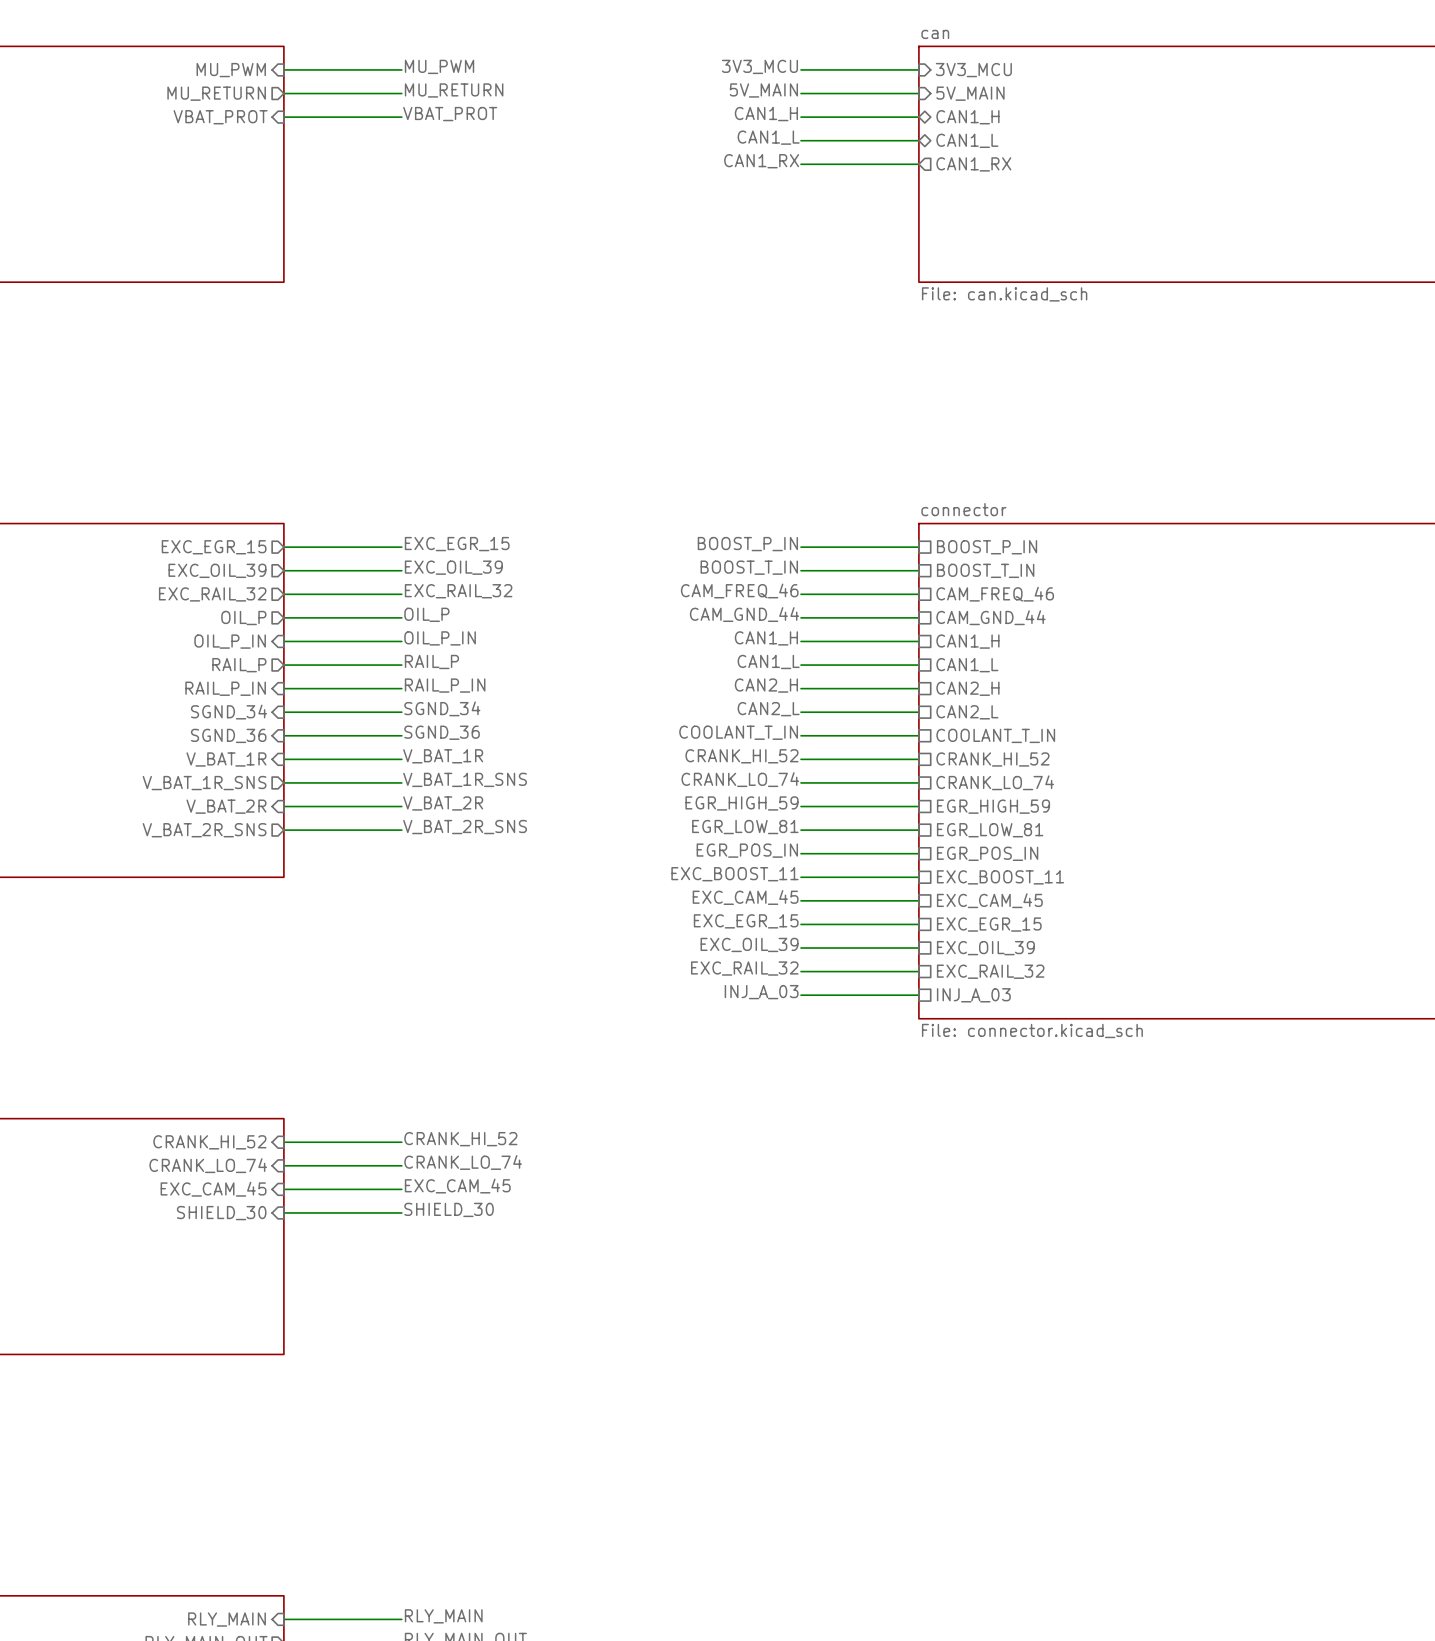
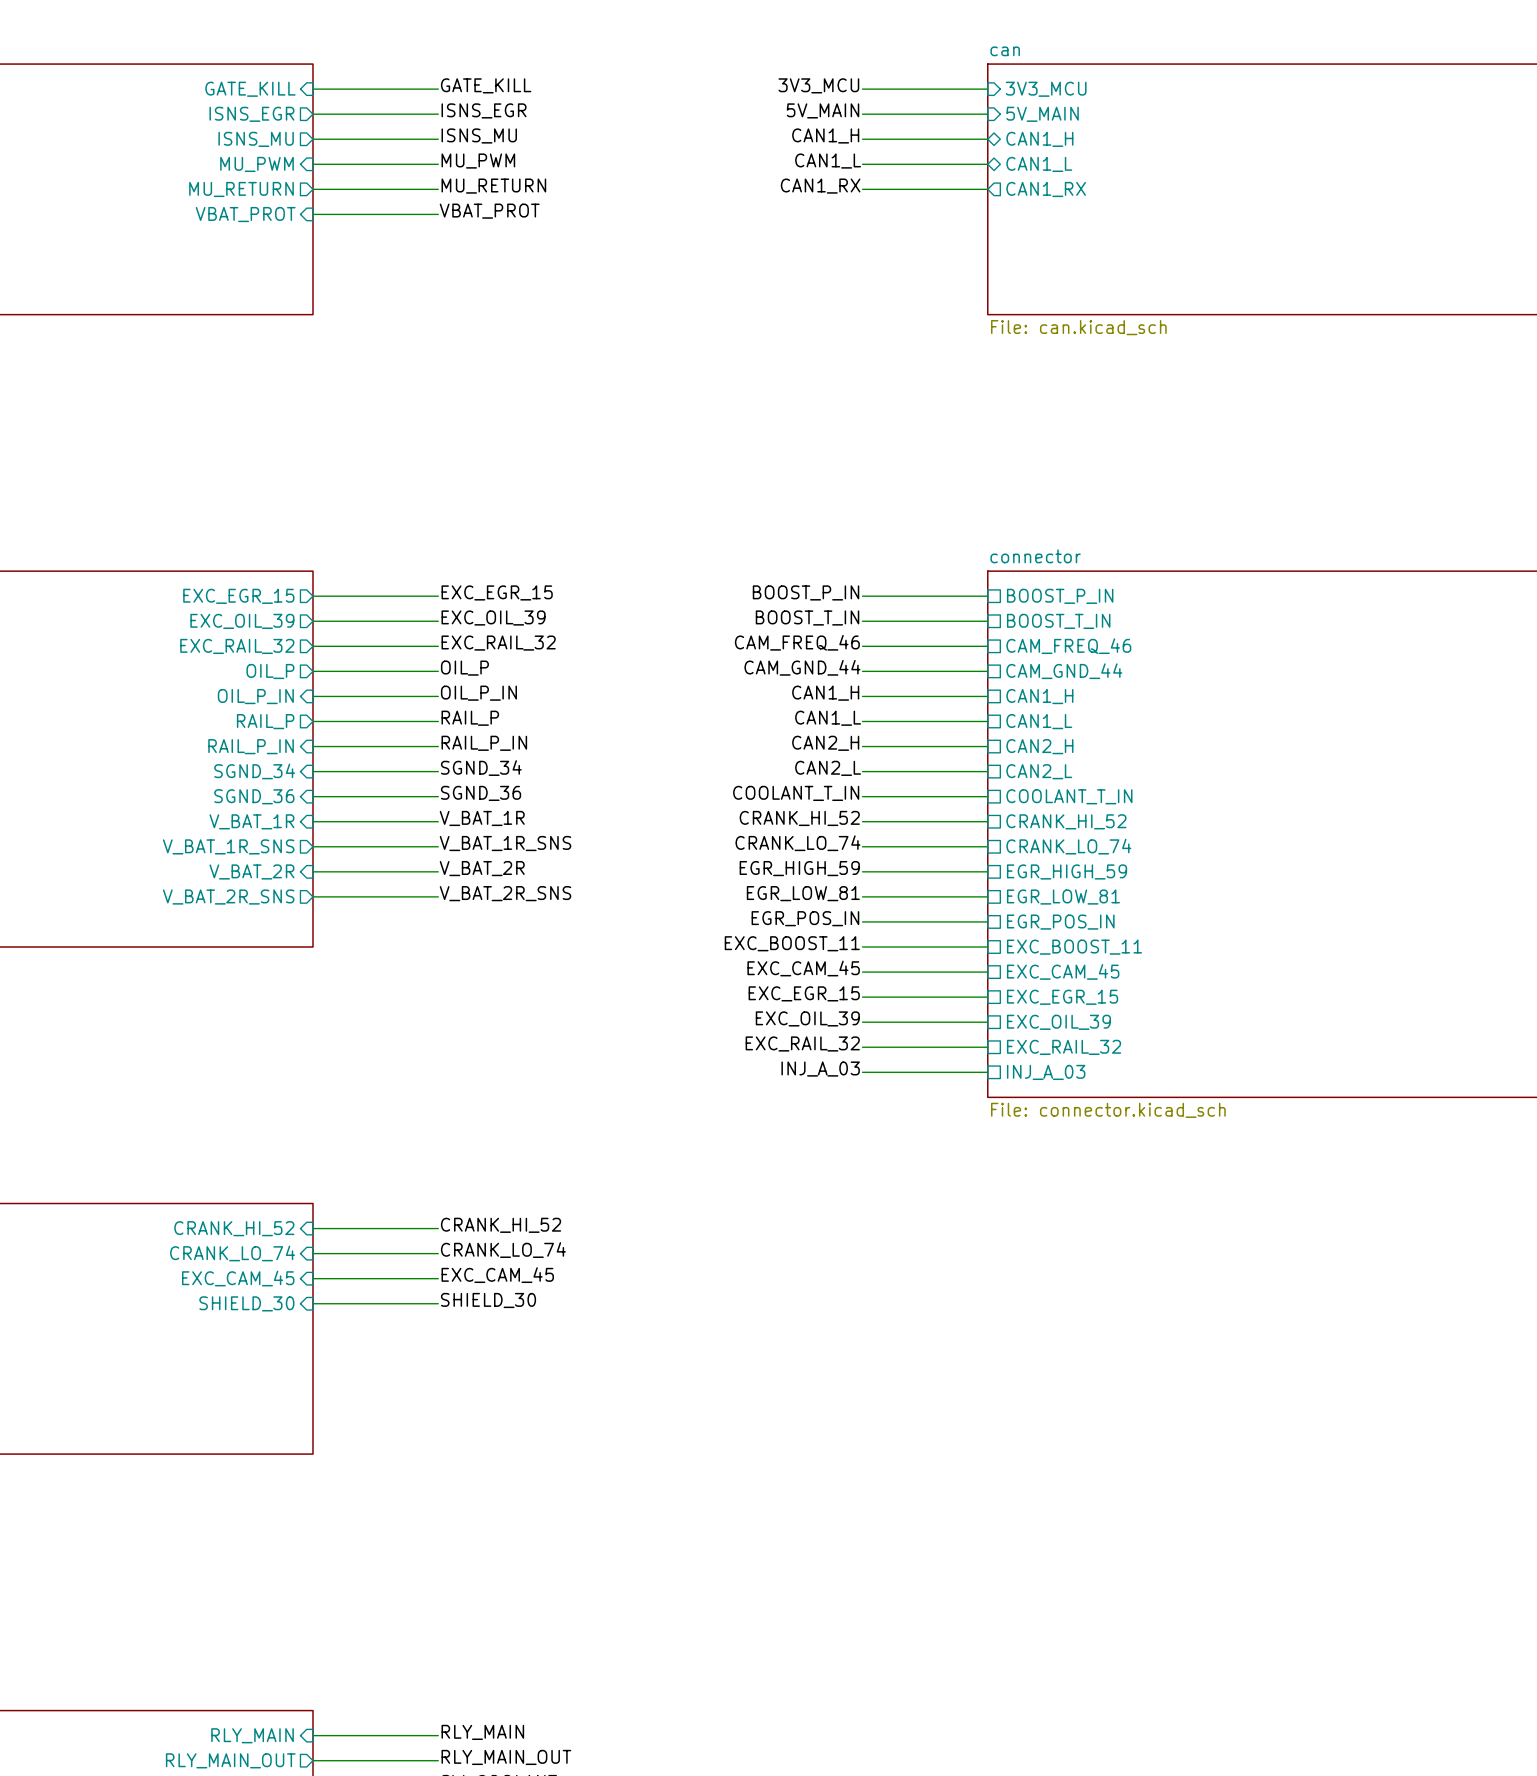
label: MU_PWM (439, 66) -> GATE_KILL (486, 85)
sheet pin: MU_PWM (231, 70) -> GATE_KILL (250, 89)
label: MU_RETURN (454, 90) -> ISNS_EGR (484, 110)
sheet pin: MU_RETURN (216, 93) -> ISNS_EGR (251, 114)
label: VBAT_PROT (450, 114) -> ISNS_MU (479, 135)
sheet pin shape: input (220, 117) -> output (256, 139)
sheet pin: VBAT_PROT (220, 117) -> ISNS_MU (256, 139)
label: none -> MU_PWM (478, 161)
sheet pin: none -> MU_PWM (257, 164)
wire: none -> (312, 164) (438, 164)
label: none -> MU_RETURN (493, 186)
sheet pin: none -> MU_RETURN (241, 189)
wire: none -> (312, 189) (438, 189)
label: none -> VBAT_PROT (489, 211)
sheet pin: none -> VBAT_PROT (245, 214)
wire: none -> (312, 214) (438, 214)

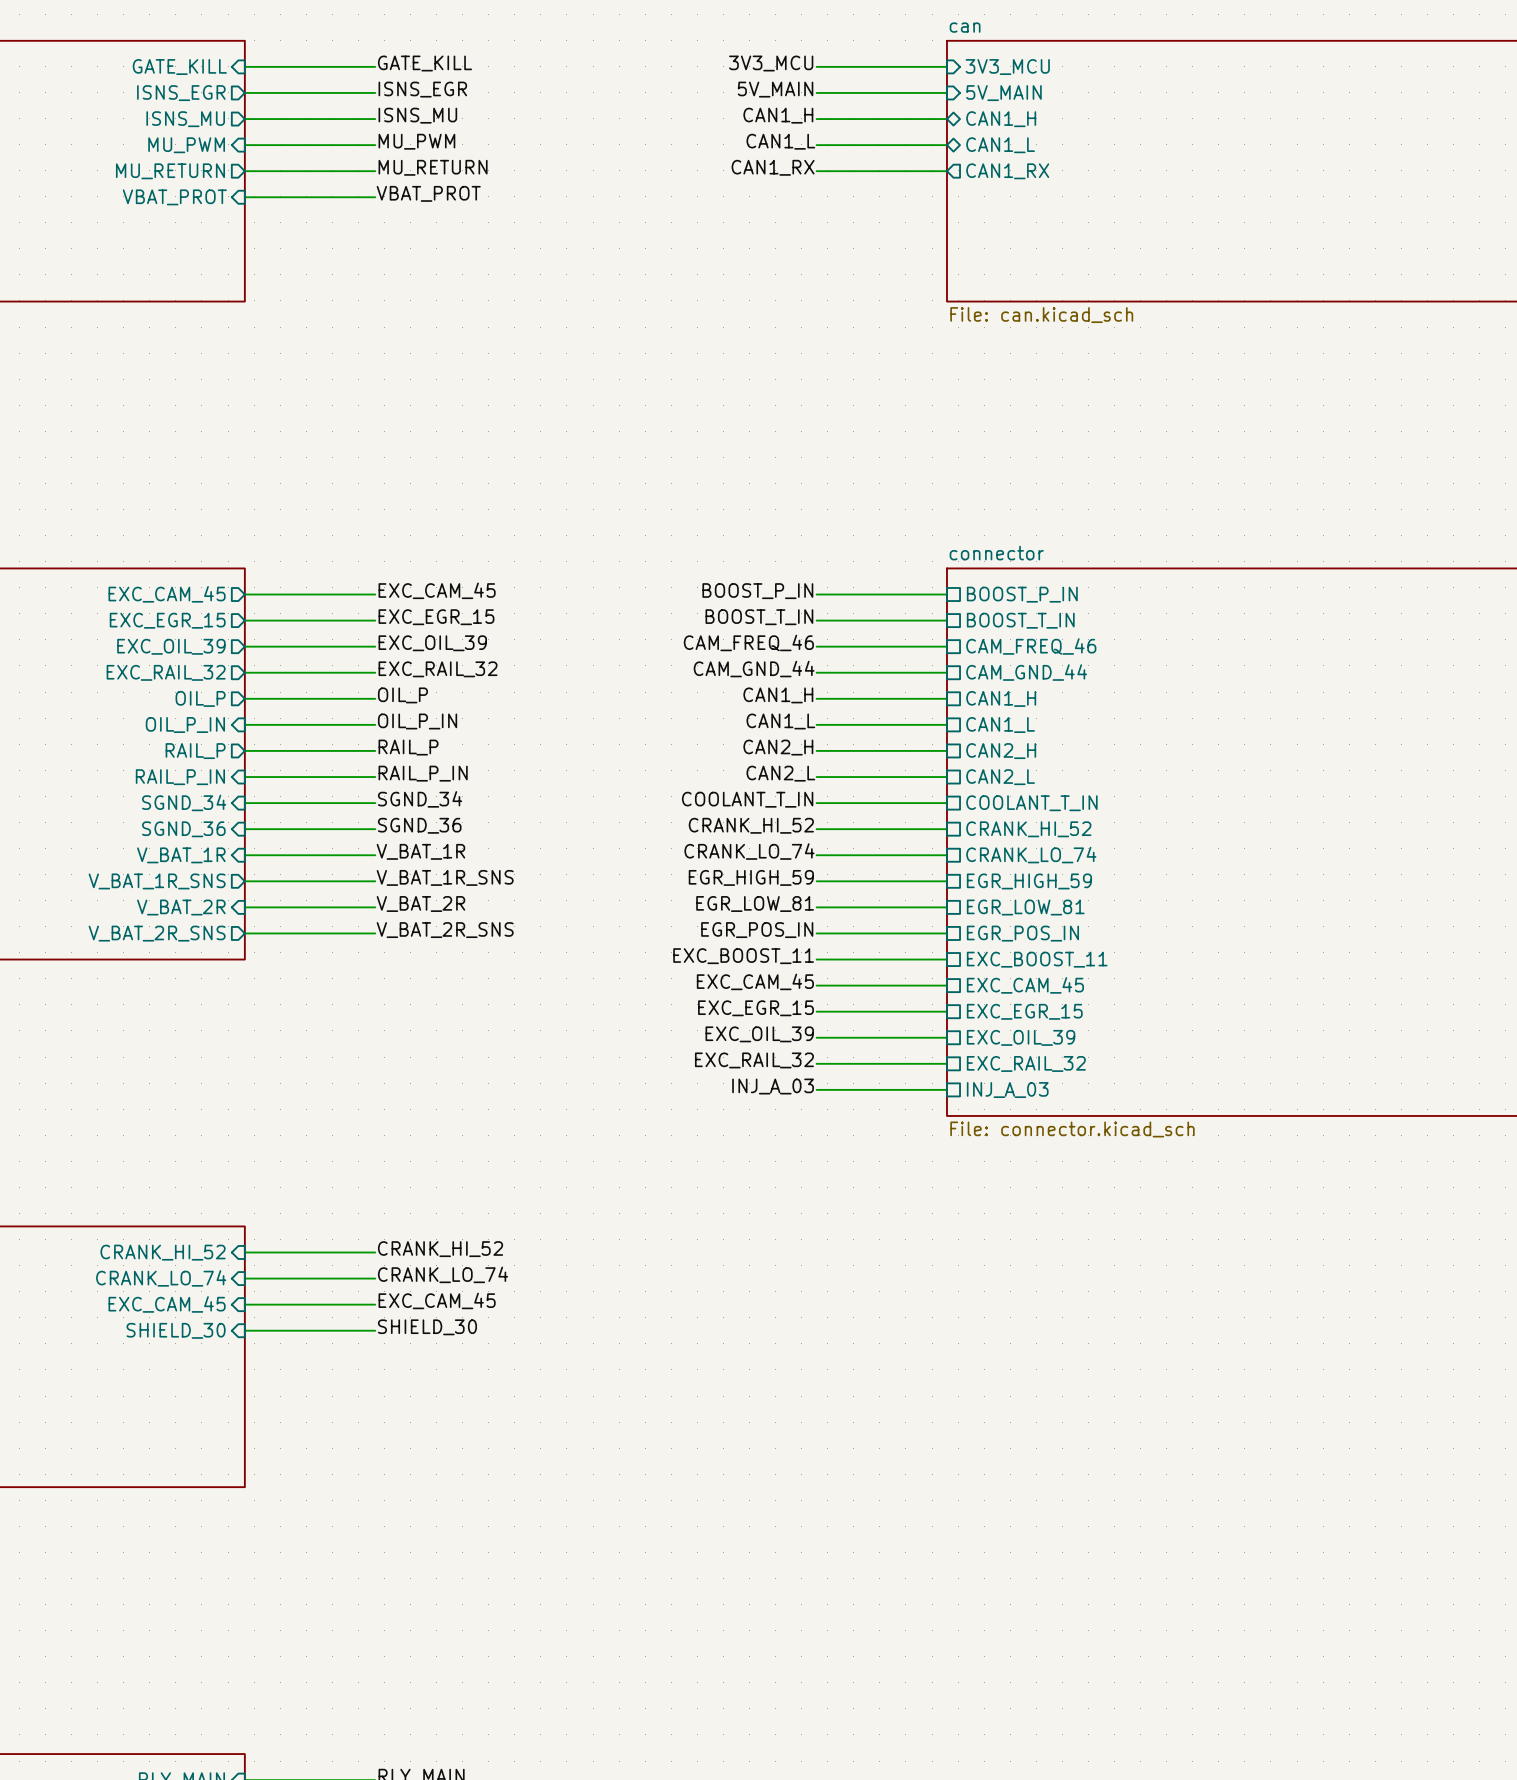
label: EXC_EGR_15 (497, 592) -> EXC_CAM_45 (437, 590)
sheet pin: EXC_EGR_15 (238, 596) -> EXC_CAM_45 (167, 594)
label: EXC_OIL_39 (493, 618) -> EXC_EGR_15 (436, 617)
sheet pin: EXC_OIL_39 (242, 621) -> EXC_EGR_15 (167, 620)
label: EXC_RAIL_32 (498, 643) -> EXC_OIL_39 (432, 643)
sheet pin: EXC_RAIL_32 (237, 646) -> EXC_OIL_39 (171, 646)
label: OIL_P (464, 668) -> EXC_RAIL_32 (438, 669)
sheet pin: OIL_P (270, 671) -> EXC_RAIL_32 (166, 672)
label: OIL_P_IN (478, 693) -> OIL_P (402, 695)
sheet pin shape: input (255, 696) -> output (200, 698)
sheet pin: OIL_P_IN (255, 696) -> OIL_P (200, 698)
label: RAIL_P (470, 718) -> OIL_P_IN (417, 721)
sheet pin shape: output (265, 721) -> input (185, 725)
sheet pin: RAIL_P (265, 721) -> OIL_P_IN (185, 725)
label: RAIL_P_IN (484, 743) -> RAIL_P (408, 747)
sheet pin shape: input (251, 746) -> output (195, 751)
sheet pin: RAIL_P_IN (251, 746) -> RAIL_P (195, 751)
label: SGND_34 (481, 768) -> RAIL_P_IN (423, 773)
sheet pin: SGND_34 (254, 771) -> RAIL_P_IN (180, 777)
label: SGND_36 (481, 793) -> SGND_34 (420, 799)
sheet pin: SGND_36 (254, 796) -> SGND_34 (184, 802)
label: V_BAT_1R (482, 818) -> SGND_36 (419, 825)
sheet pin: V_BAT_1R (251, 821) -> SGND_36 (183, 829)
label: V_BAT_1R_SNS (505, 843) -> V_BAT_1R (420, 851)
sheet pin shape: output (228, 846) -> input (181, 855)
sheet pin: V_BAT_1R_SNS (228, 846) -> V_BAT_1R (181, 855)
label: V_BAT_2R (482, 868) -> V_BAT_1R_SNS (445, 877)
sheet pin shape: input (251, 871) -> output (157, 881)
sheet pin: V_BAT_2R (251, 871) -> V_BAT_1R_SNS (157, 881)
label: V_BAT_2R_SNS (505, 893) -> V_BAT_2R (420, 904)
sheet pin shape: output (228, 897) -> input (181, 907)
sheet pin: V_BAT_2R_SNS (228, 897) -> V_BAT_2R (181, 907)
label: none -> V_BAT_2R_SNS (445, 930)
wire: none -> (244, 933) (375, 933)
sheet pin: none -> V_BAT_2R_SNS (157, 933)

